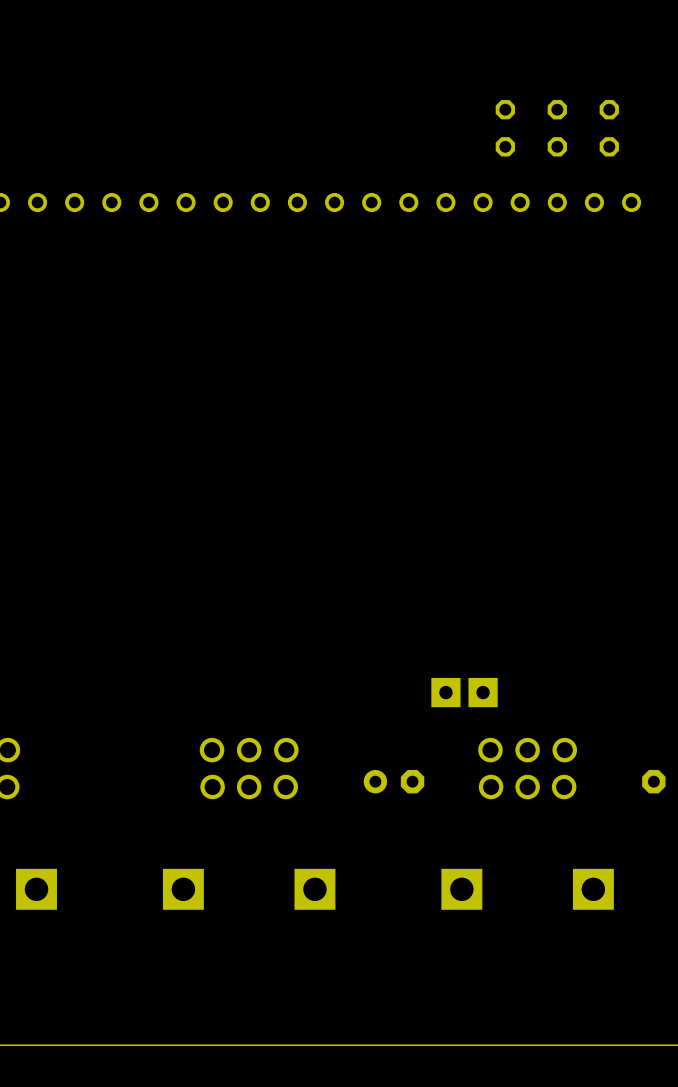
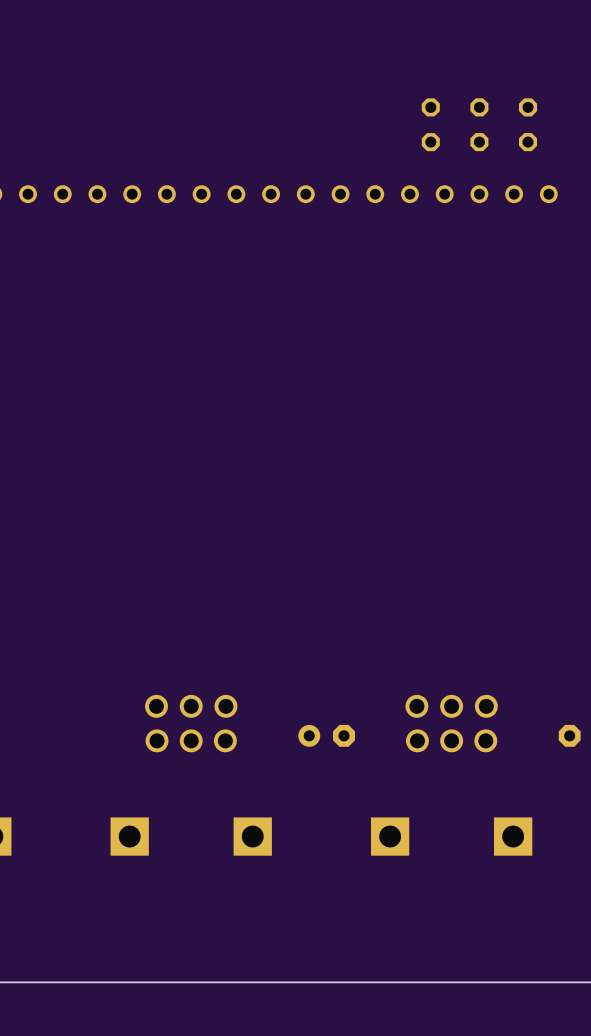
part: (445, 692) -> none
part: (483, 692) -> none

